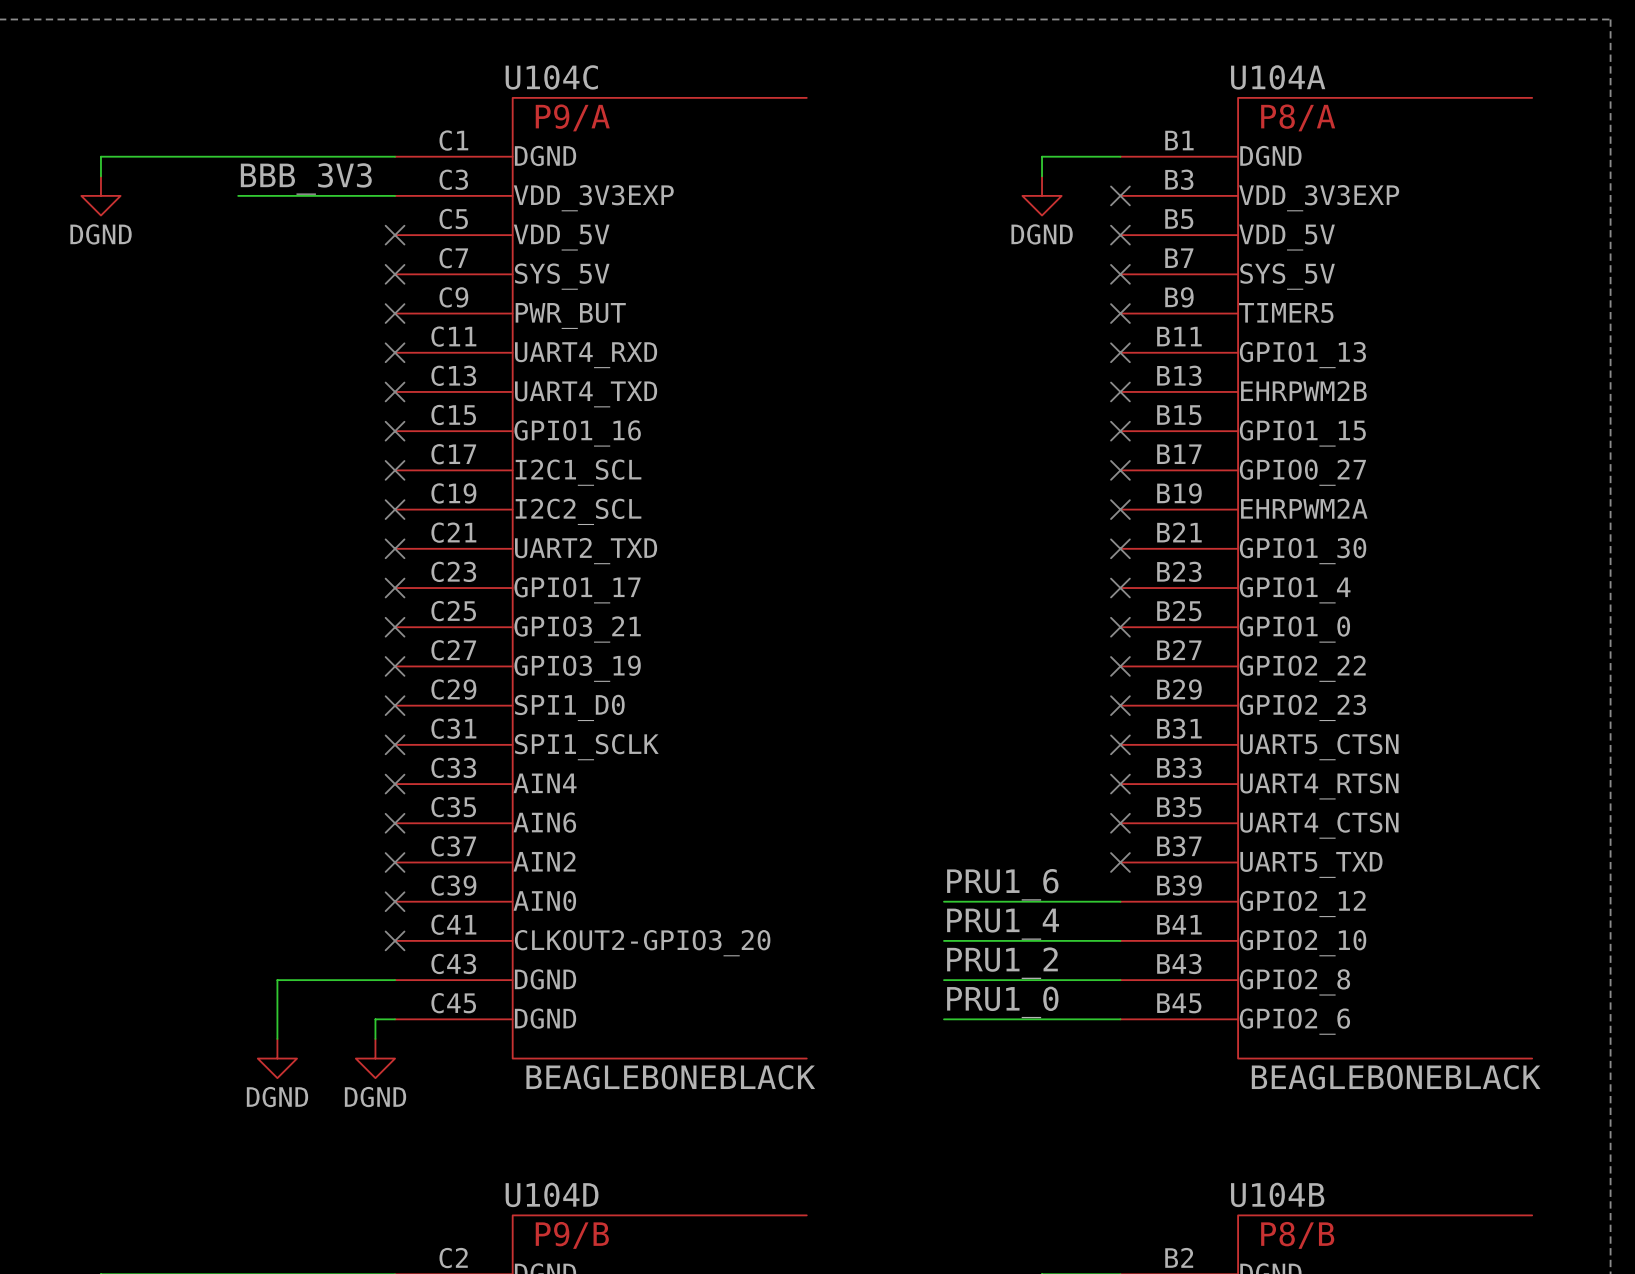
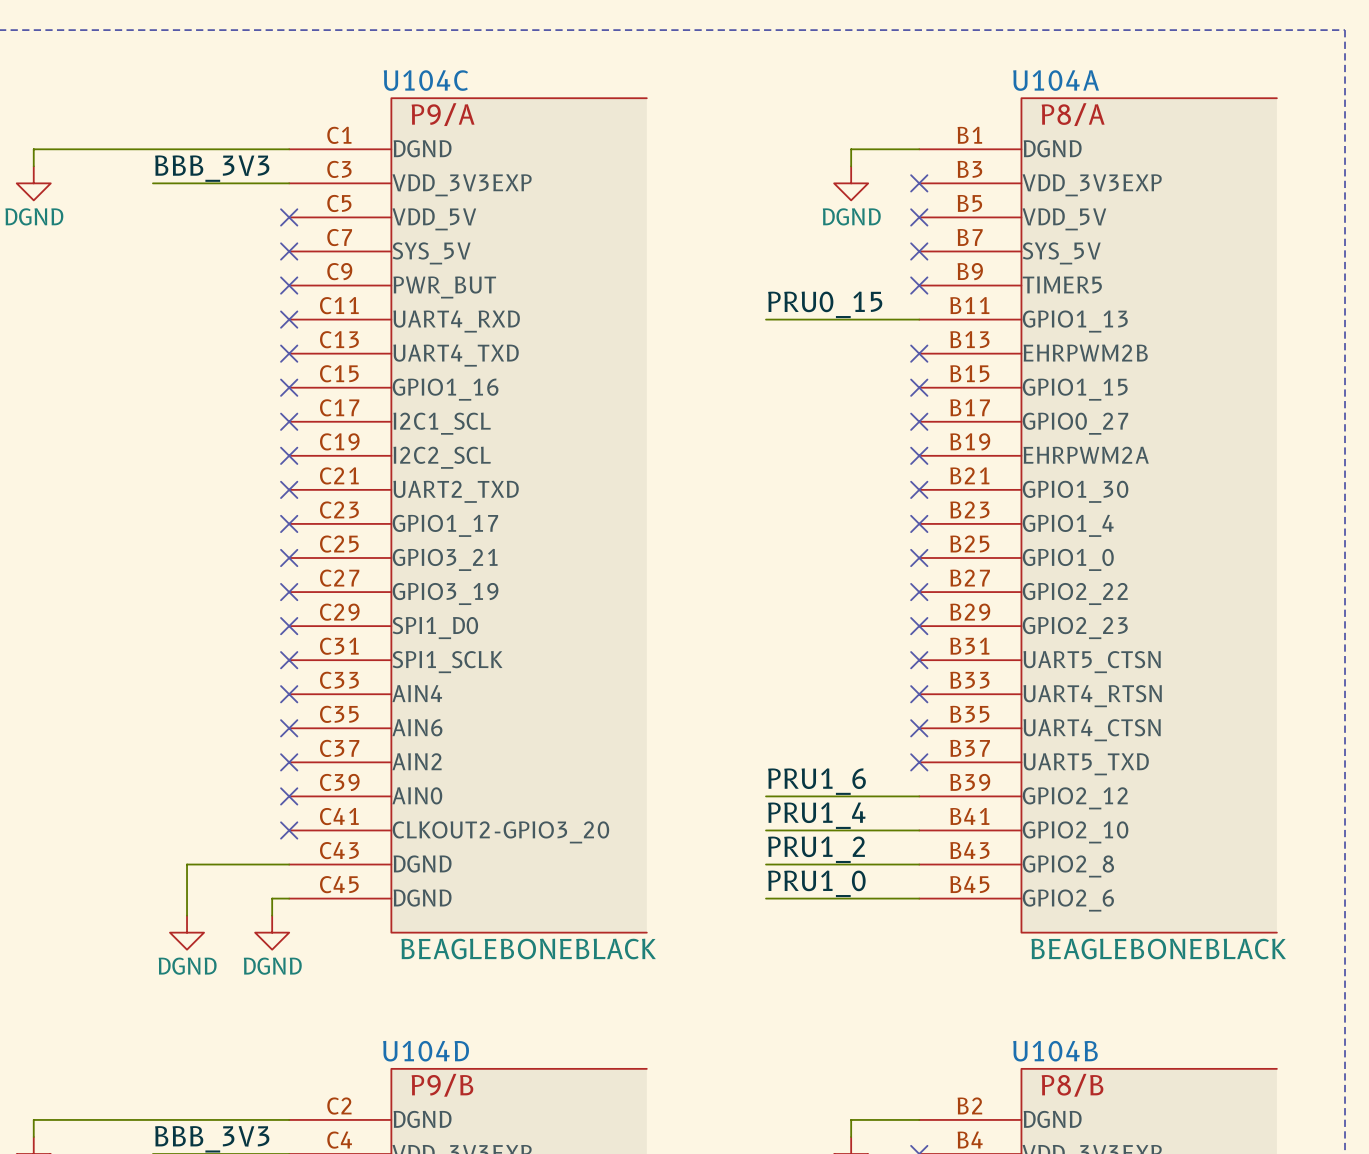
label: none -> PRU0_15 (825, 304)
wire: none -> (766, 319) (919, 319)
no-connect mark: (1120, 352) -> none

